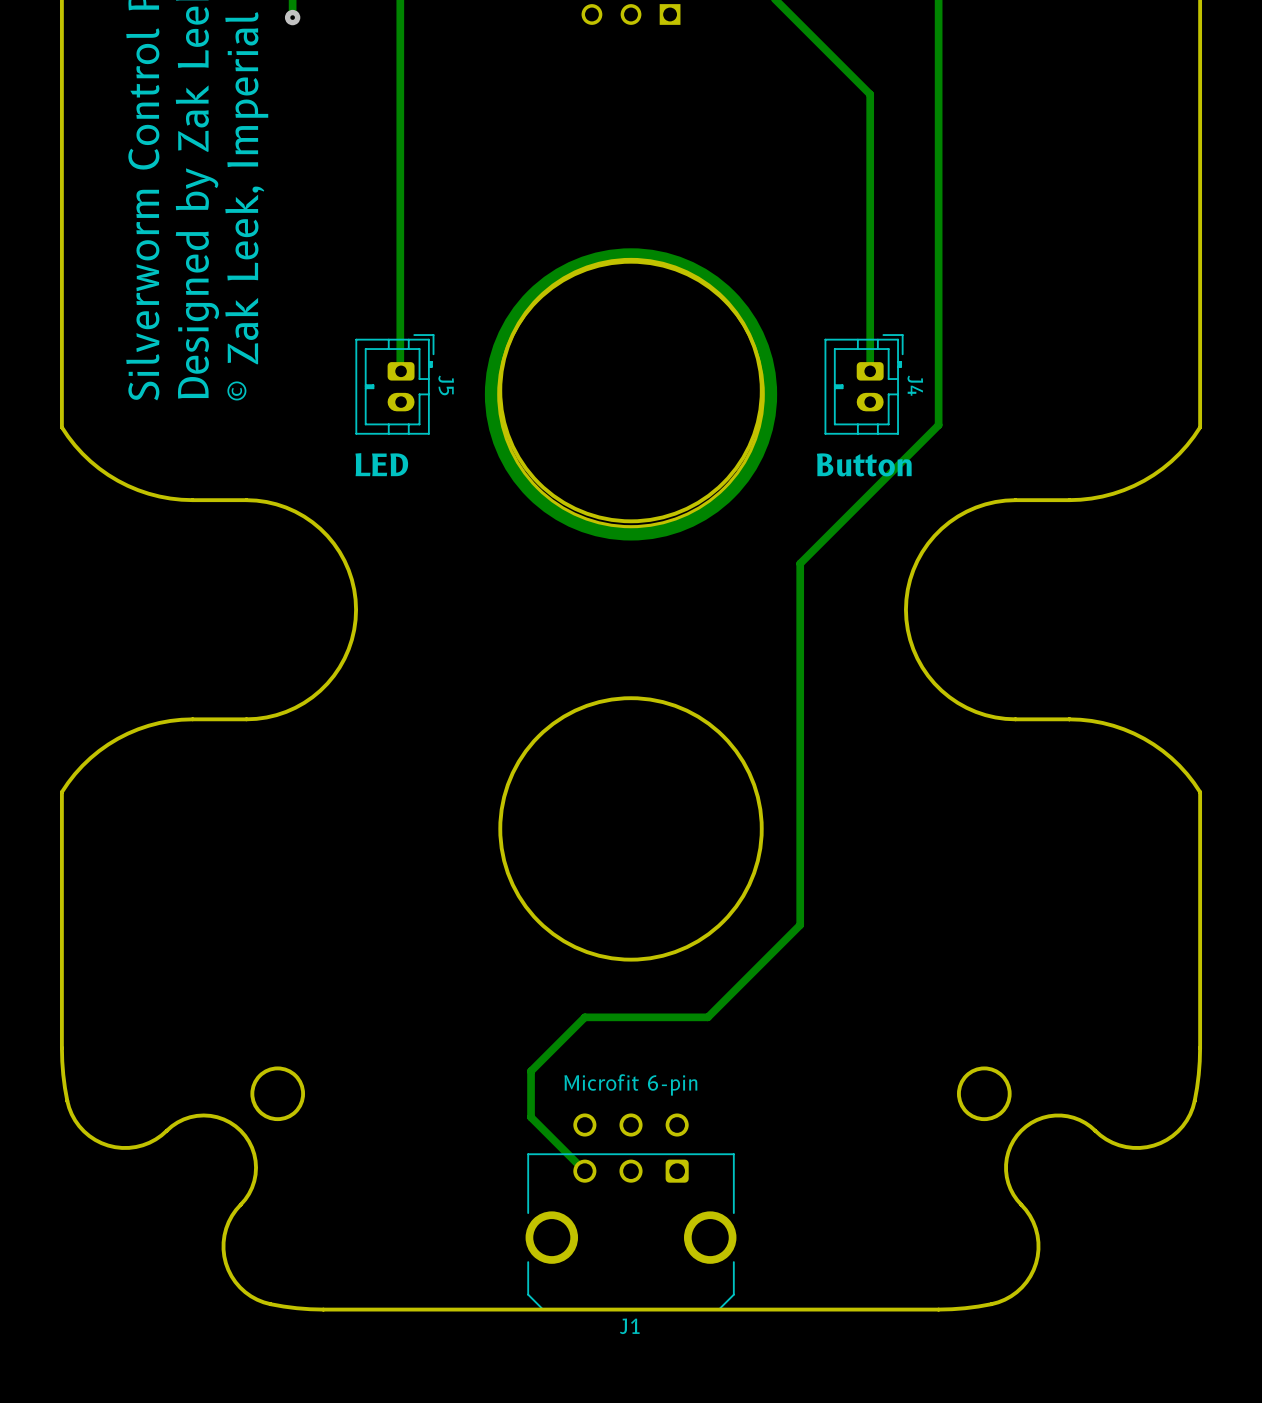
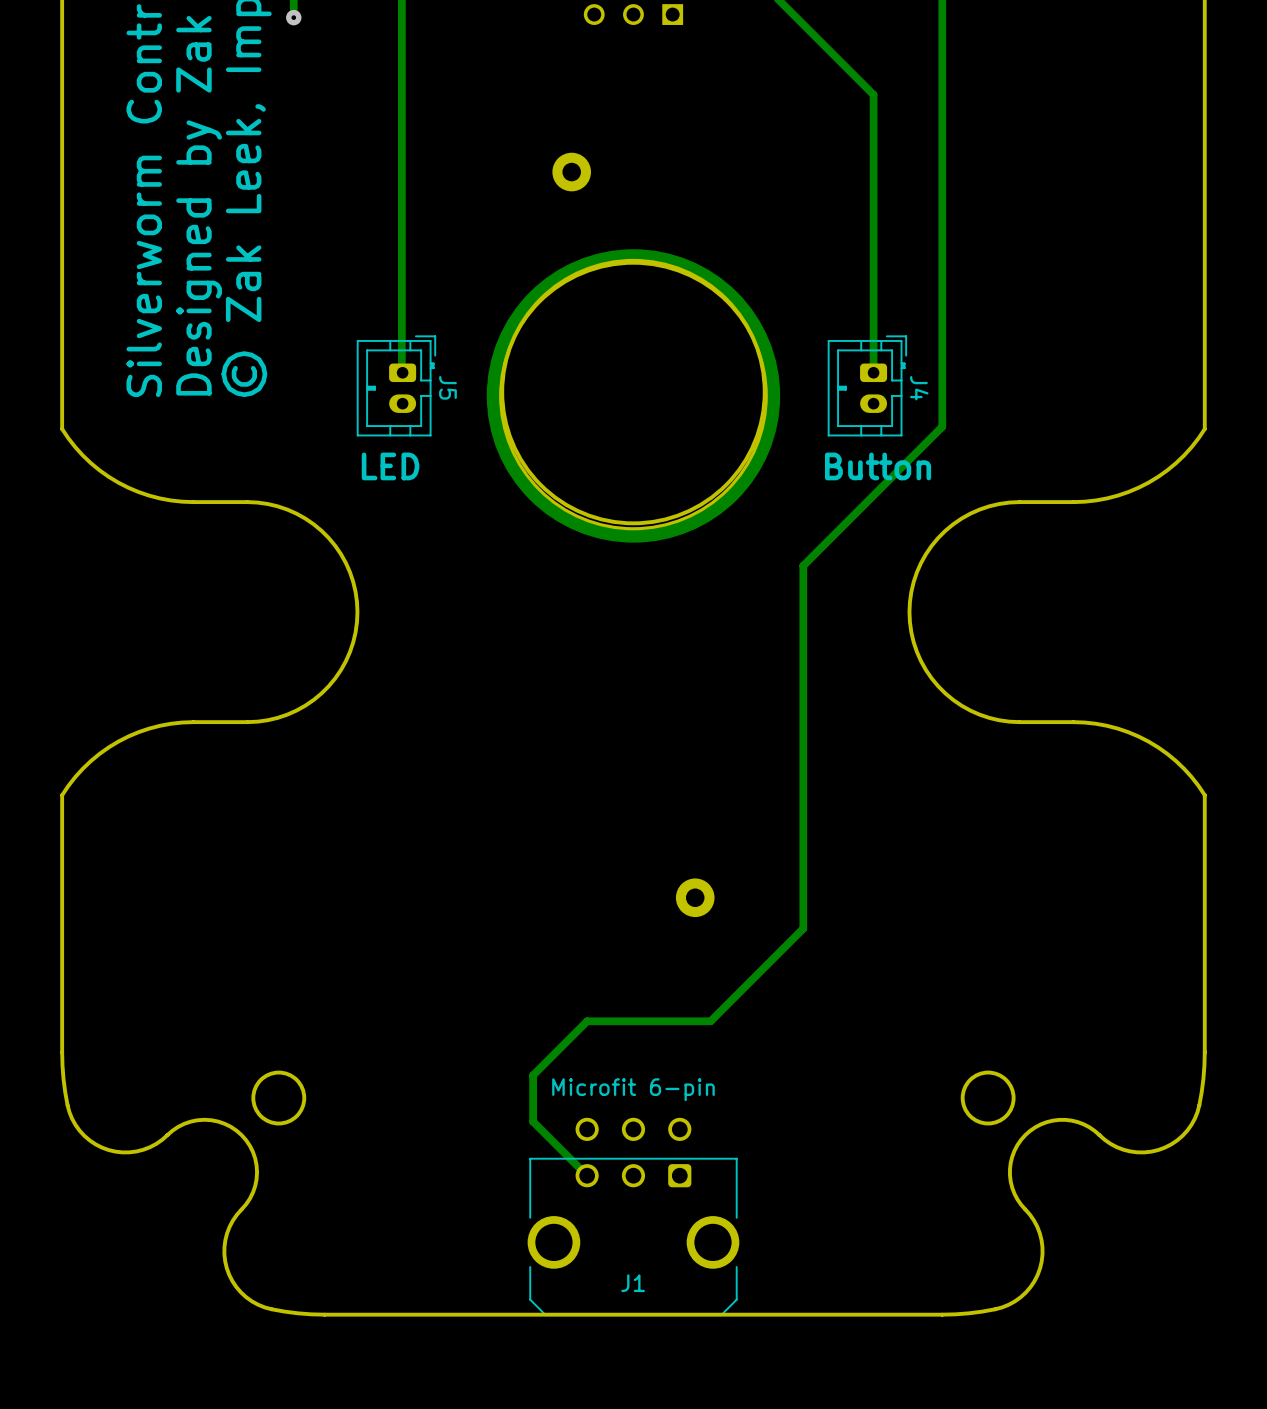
part: none -> (571, 172)
round board edge: [498, 696, 764, 962] -> none
part: none -> (695, 897)
J1 name position: J1 (629, 1326) -> J1 (633, 1283)

